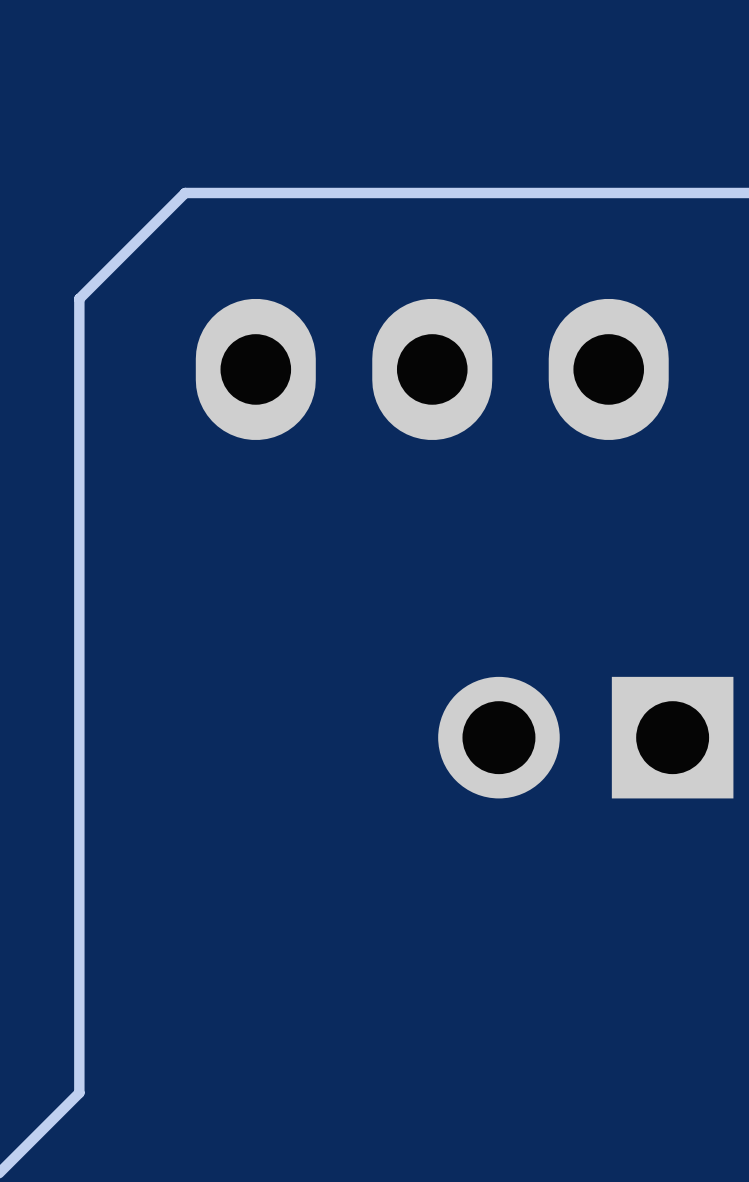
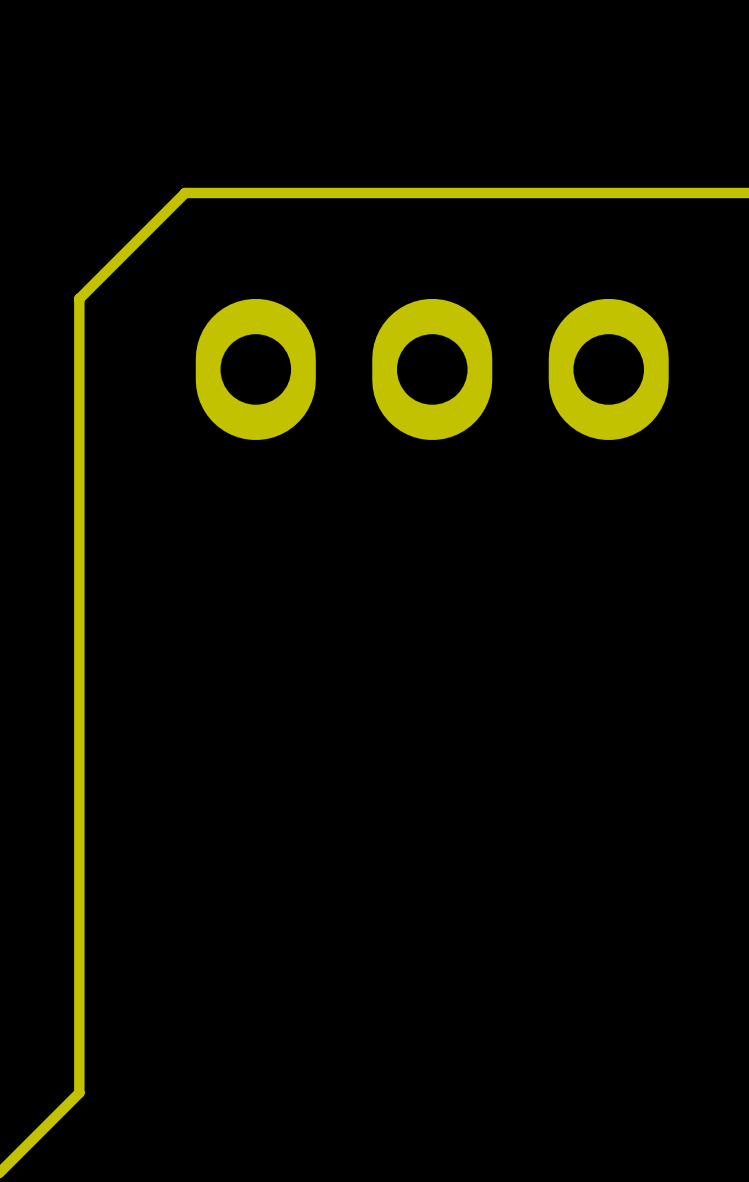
part: (585, 737) -> none

